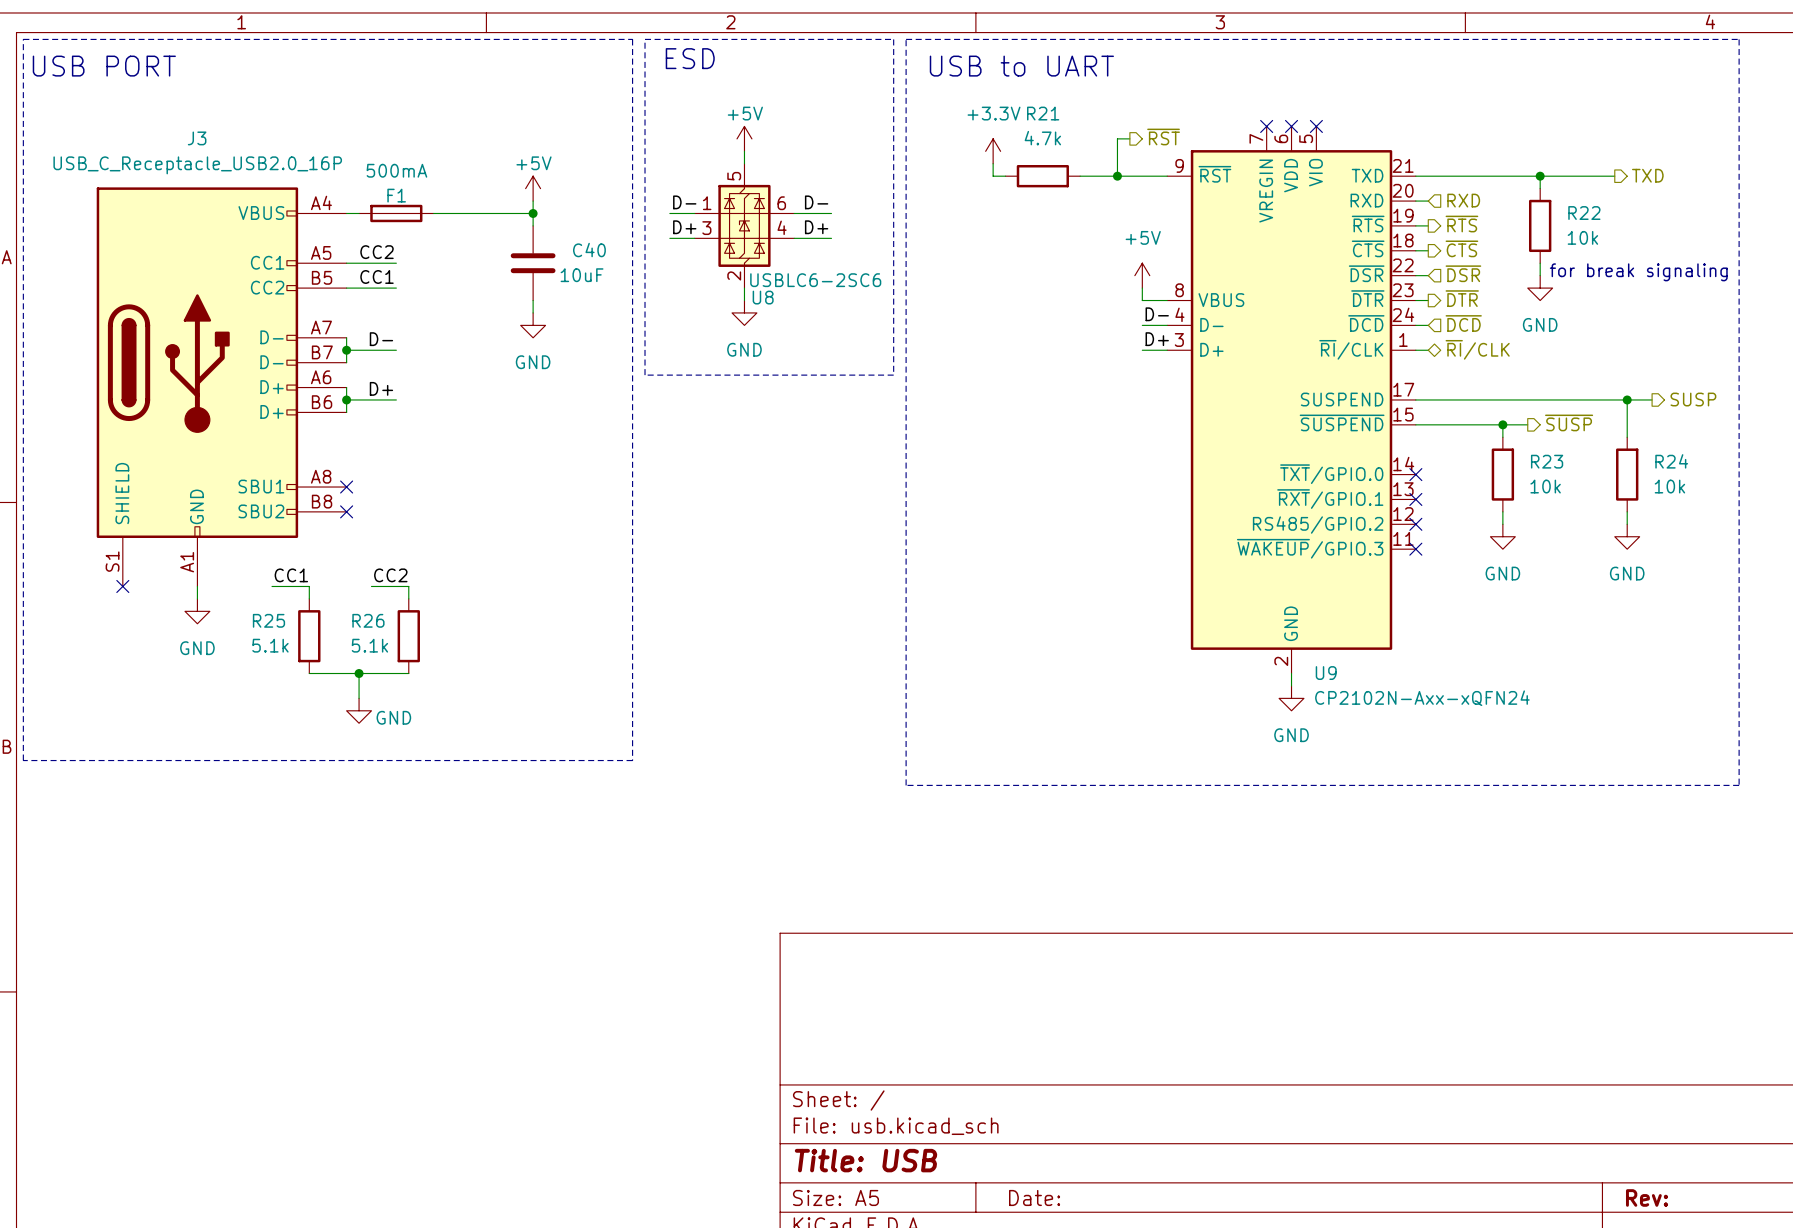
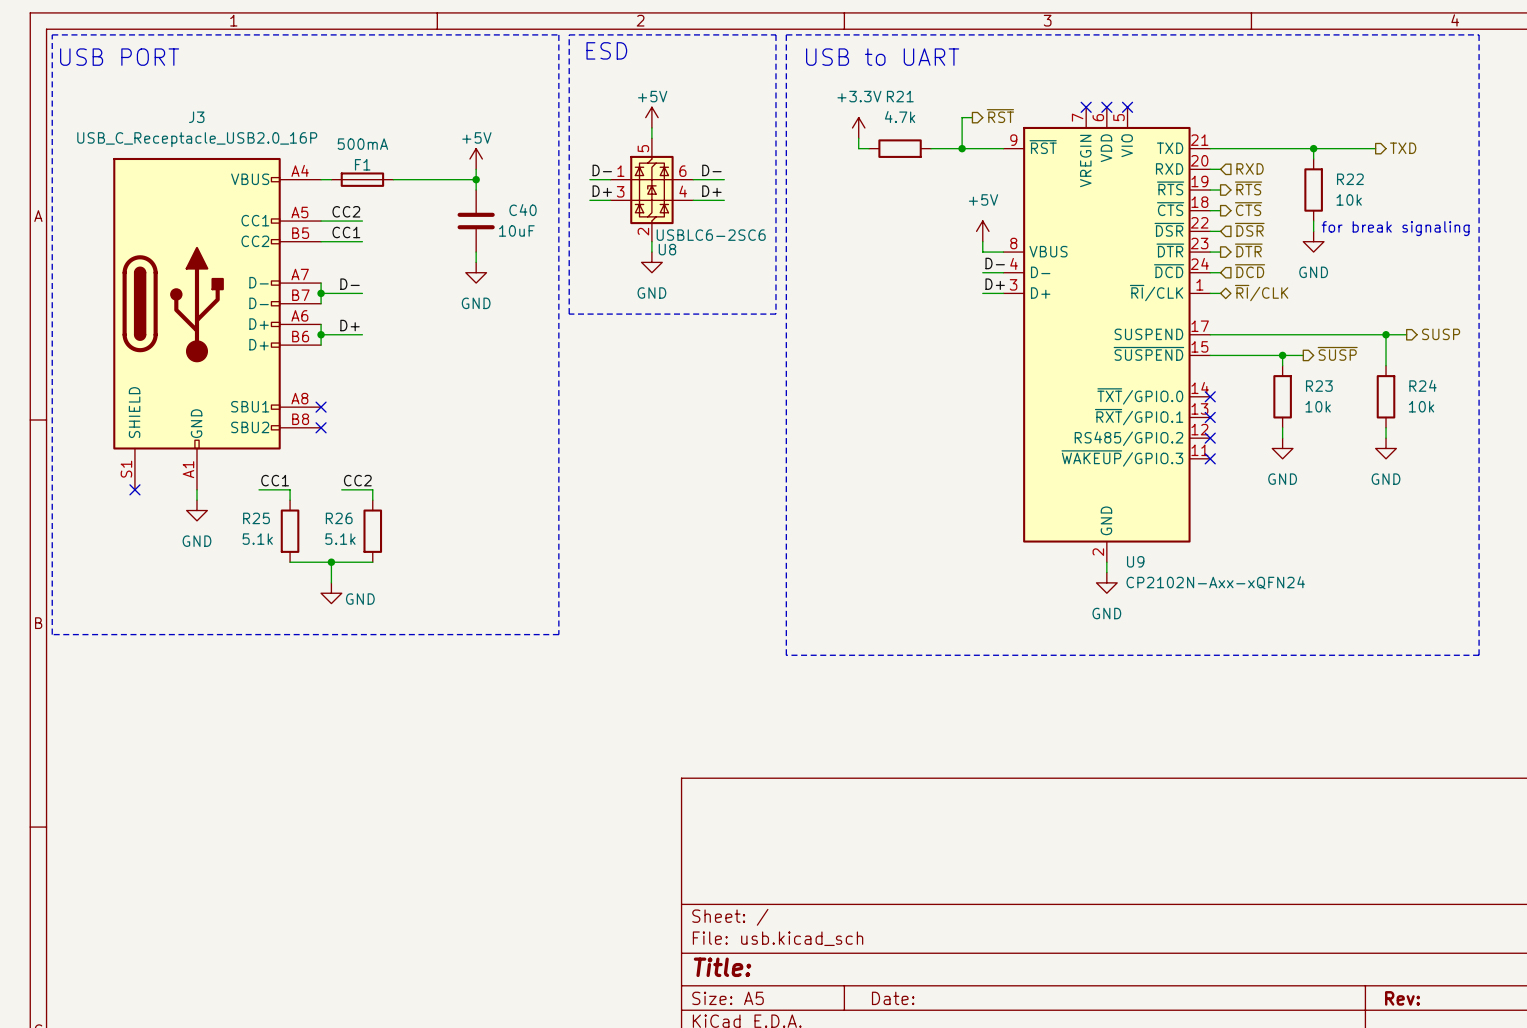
title block: Title: USB (866, 1160) -> Title: (722, 967)

